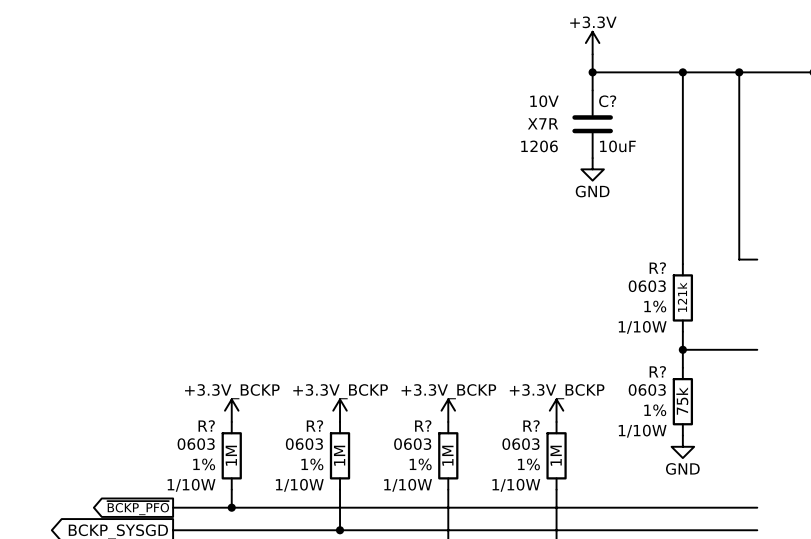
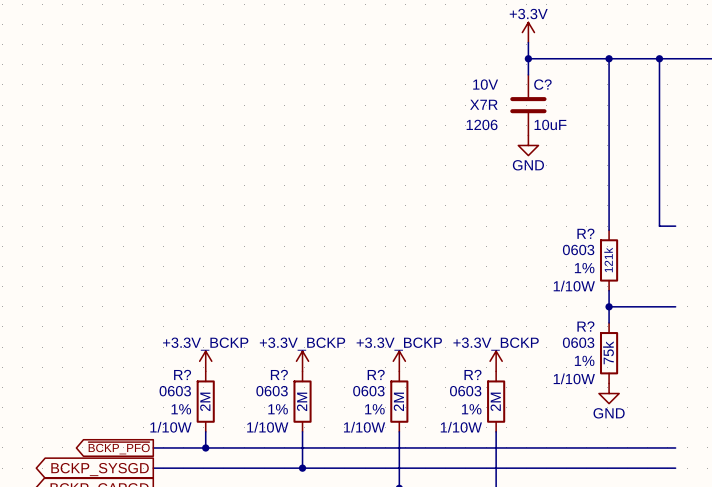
R? value: 1M (231, 455) -> 2M (205, 401)
R? value: 1M (339, 455) -> 2M (302, 401)
R? value: 1M (447, 455) -> 2M (398, 401)
R? value: 1M (556, 455) -> 2M (495, 401)

